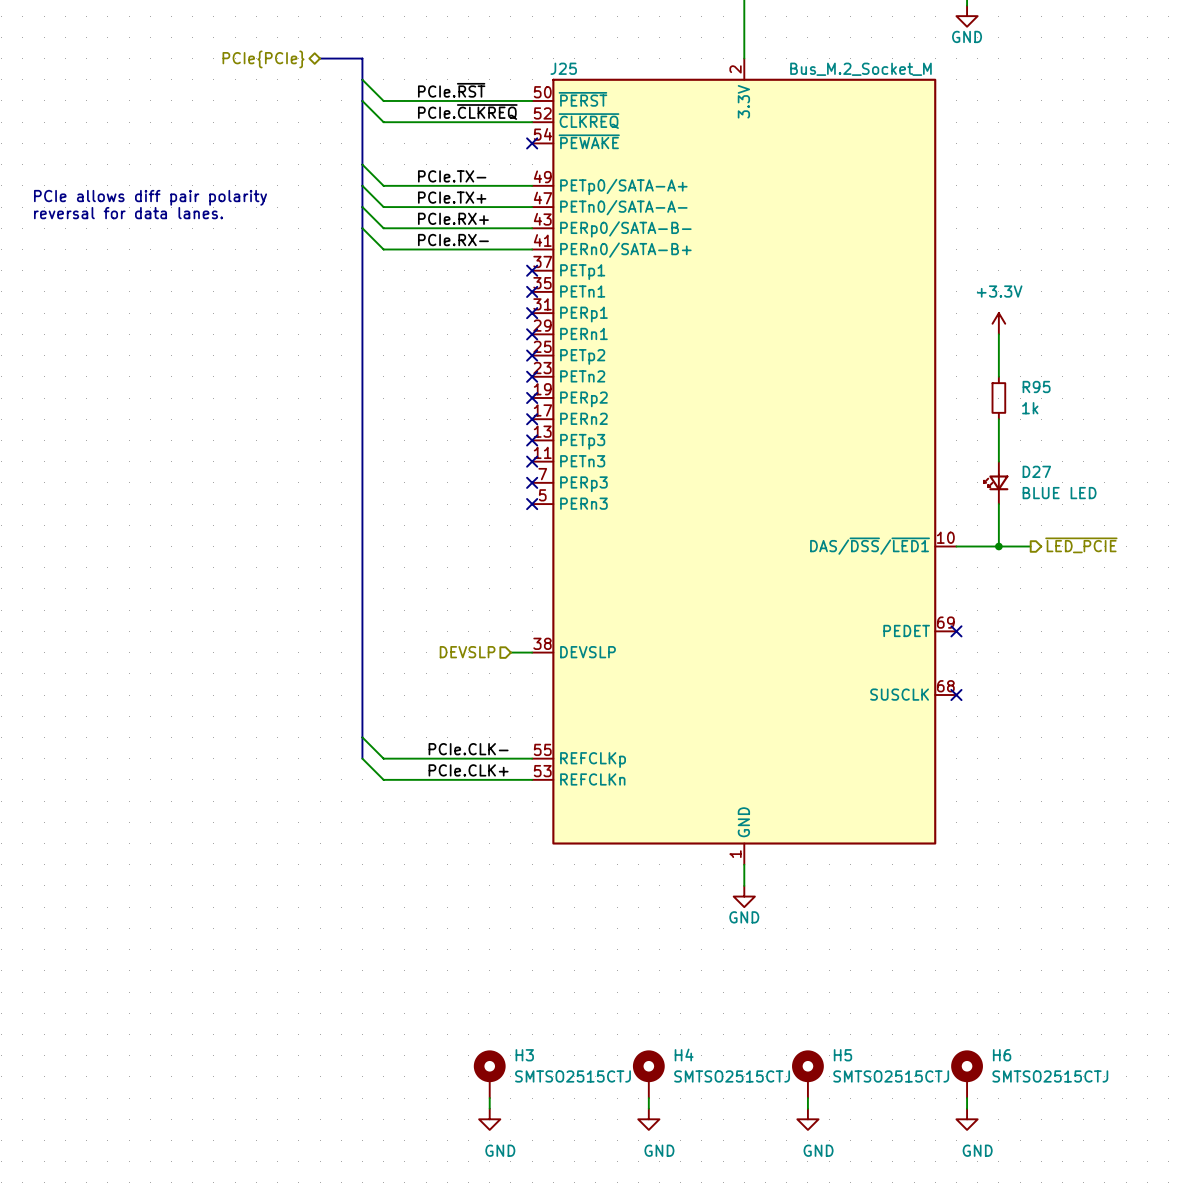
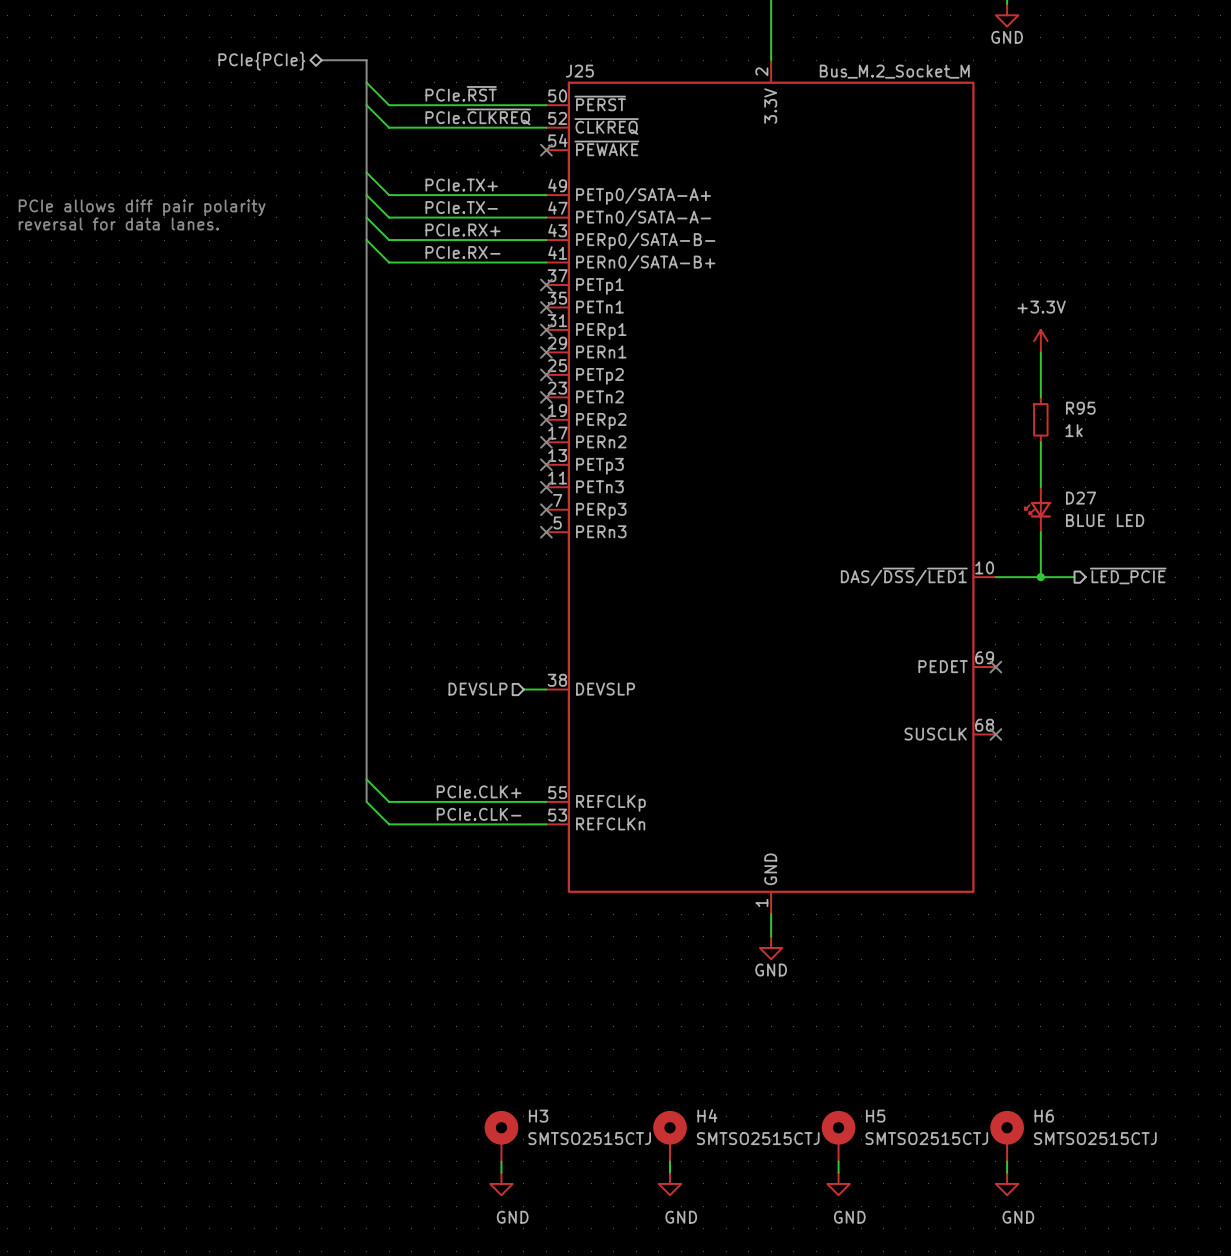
label: PCIe.TX- (452, 176) -> PCIe.TX+ (461, 185)
label: PCIe.TX+ (452, 197) -> PCIe.TX- (461, 207)
label: PCIe.CLK- (468, 749) -> PCIe.CLK+ (479, 791)
label: PCIe.CLK+ (468, 770) -> PCIe.CLK- (479, 814)

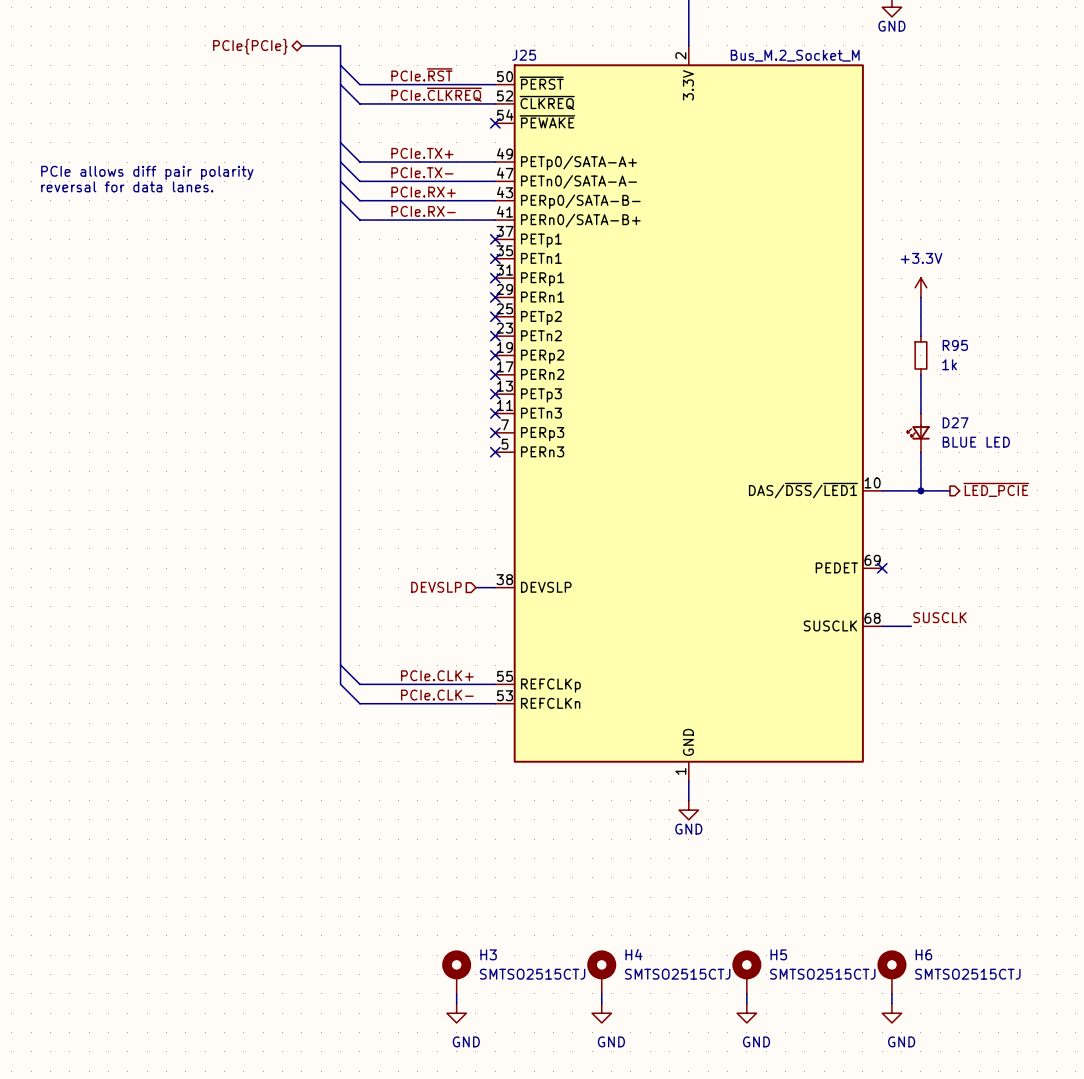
label: none -> SUSCLK (939, 617)
wire: none -> (882, 626) (911, 626)
no-connect mark: (995, 734) -> none

